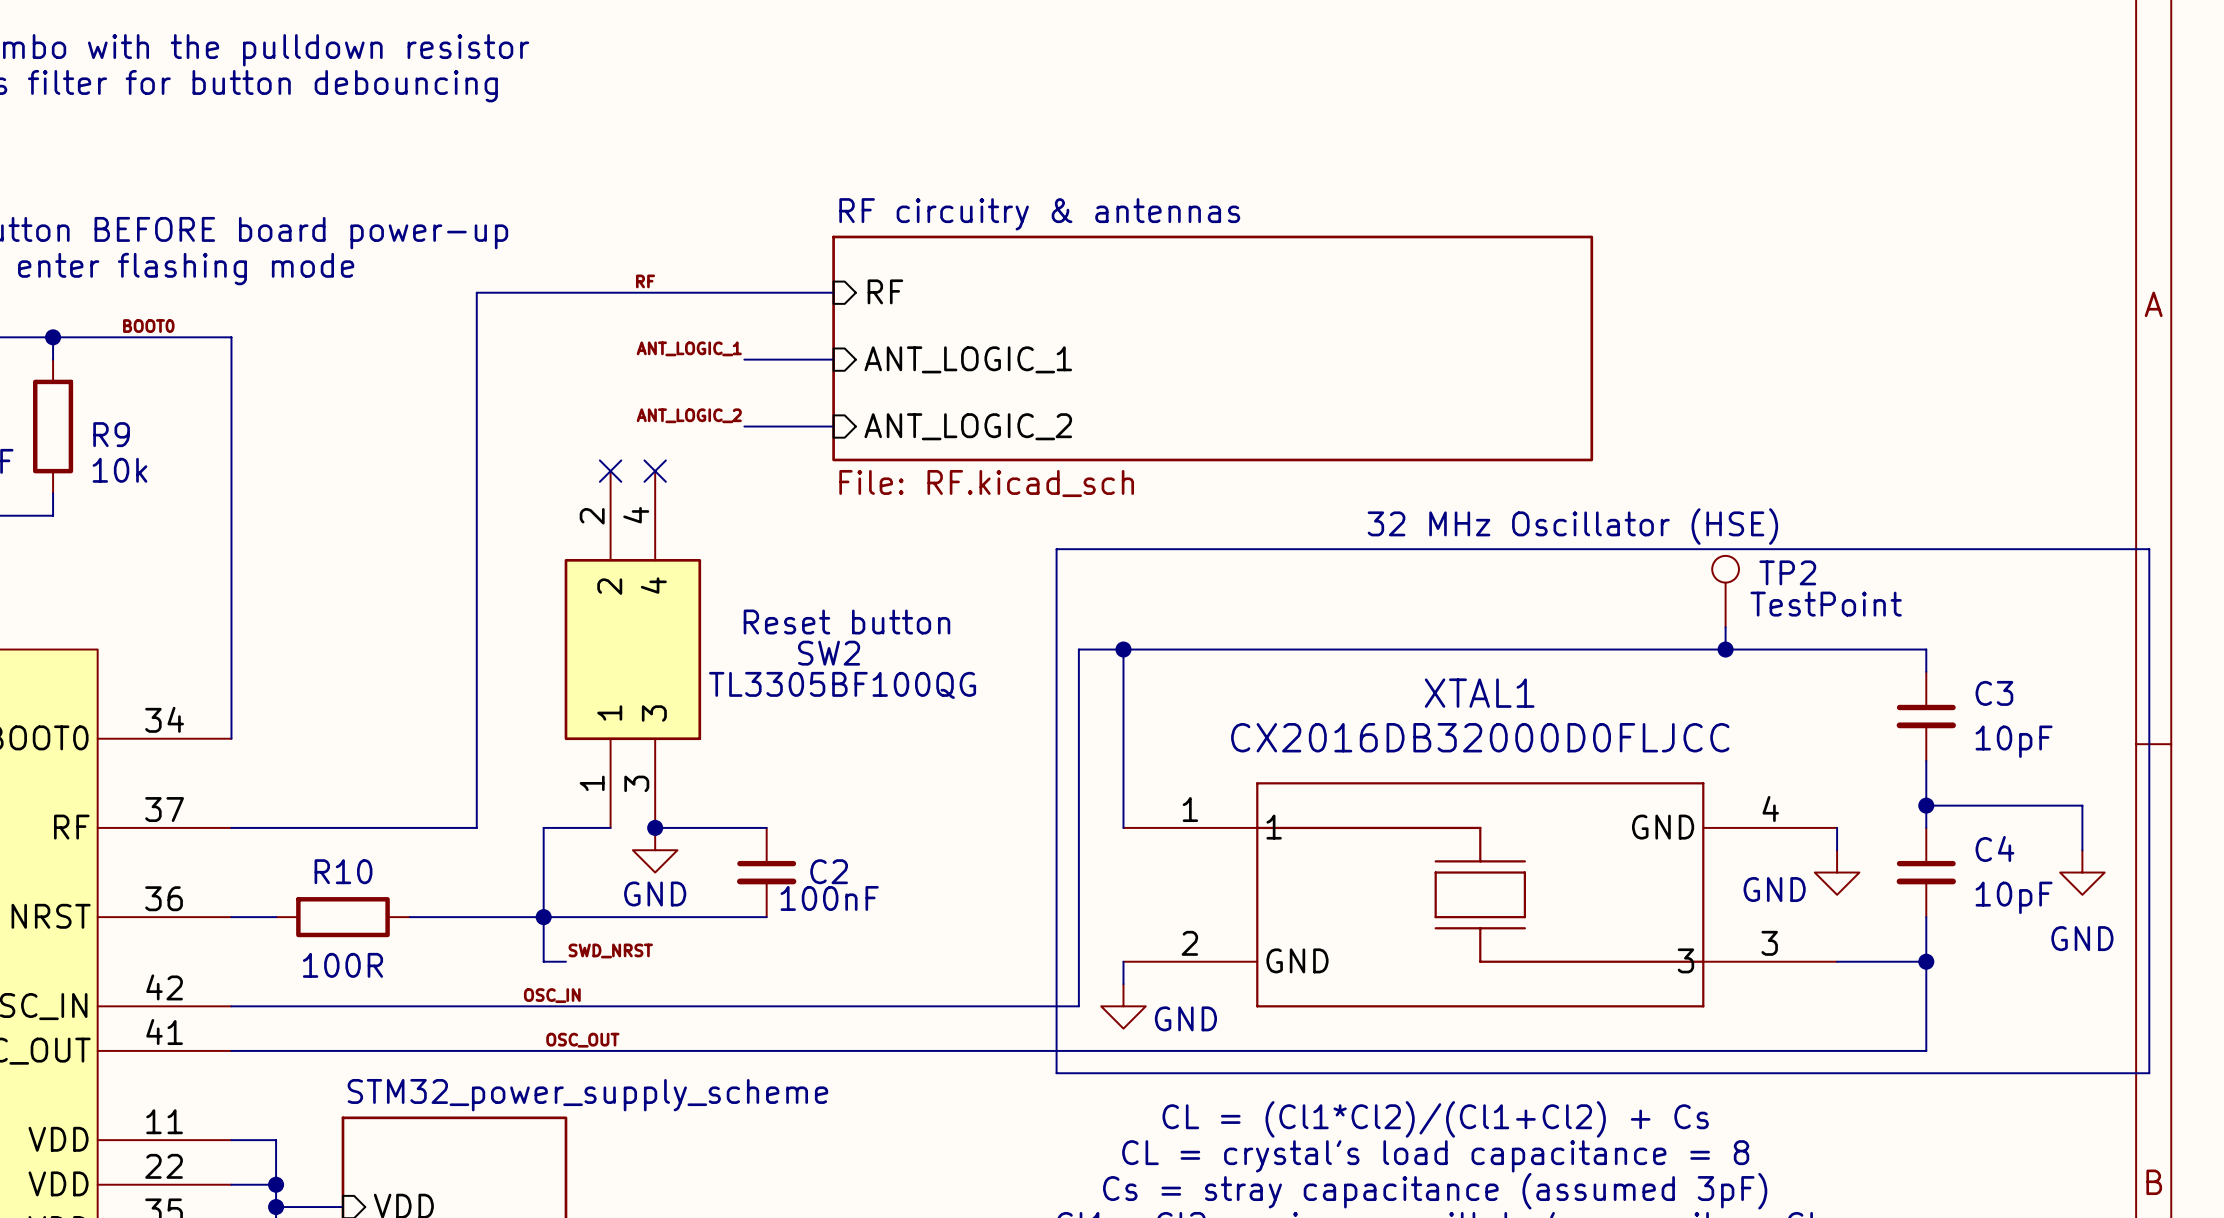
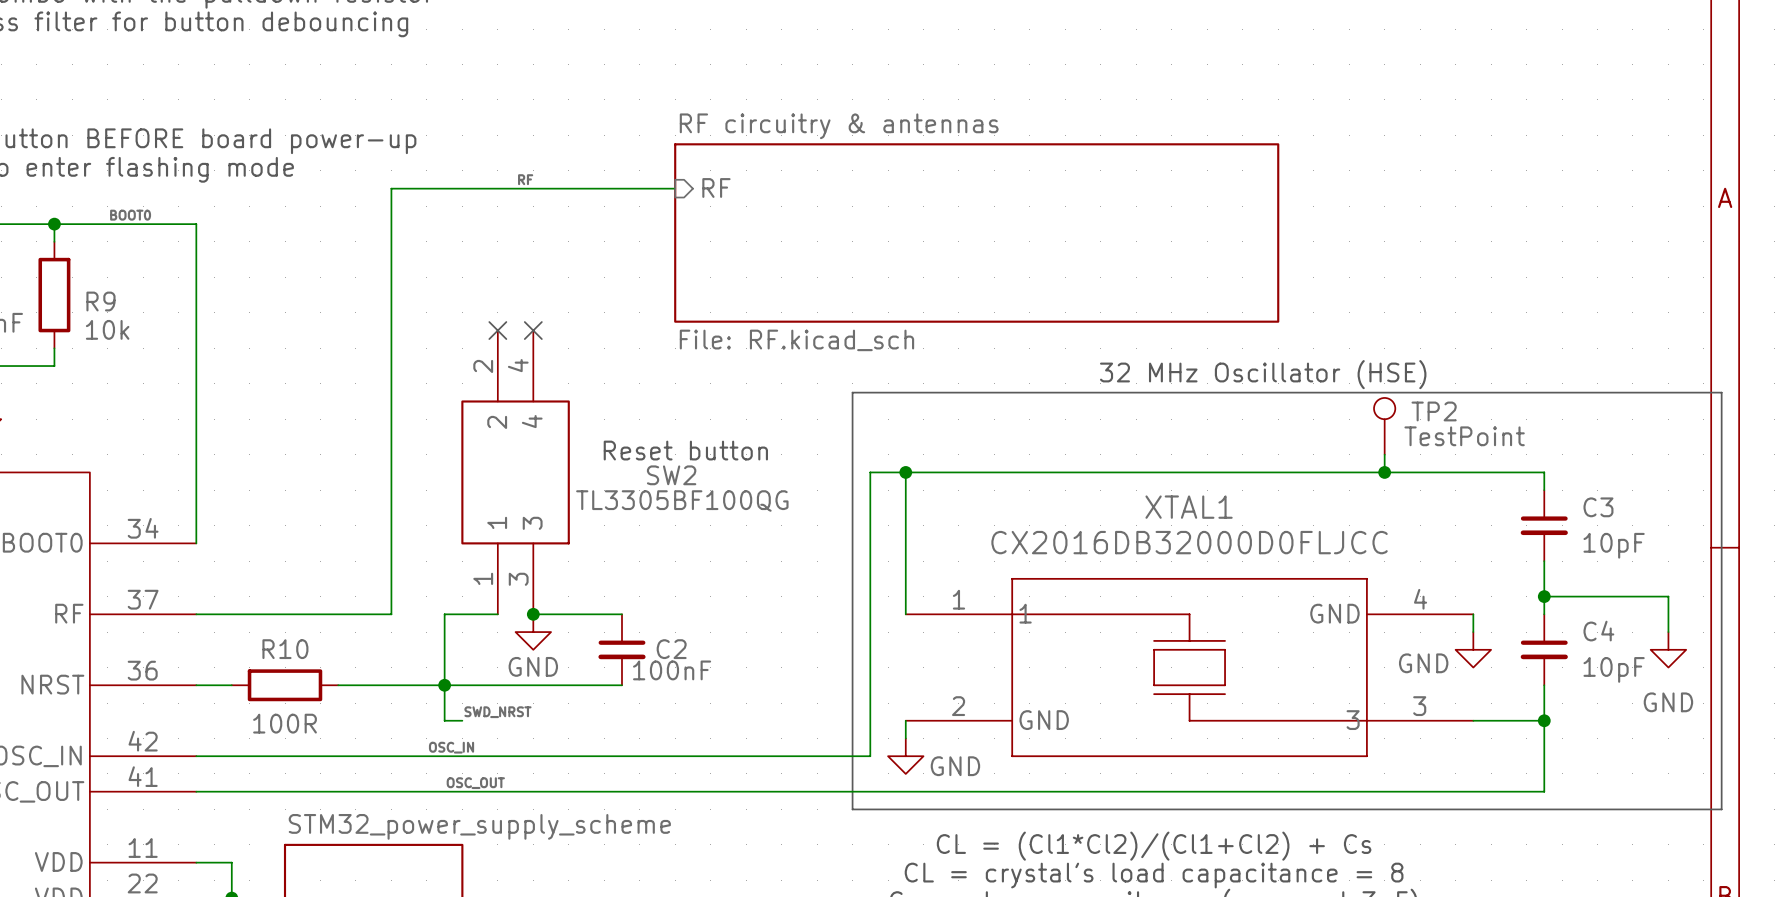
label: ANT_LOGIC_1 (689, 348) -> none
wire: (744, 359) (833, 359) -> none
sheet pin: ANT_LOGIC_1 (968, 359) -> none
label: ANT_LOGIC_2 (689, 415) -> none
wire: (744, 426) (833, 426) -> none
sheet pin: ANT_LOGIC_2 (968, 426) -> none

